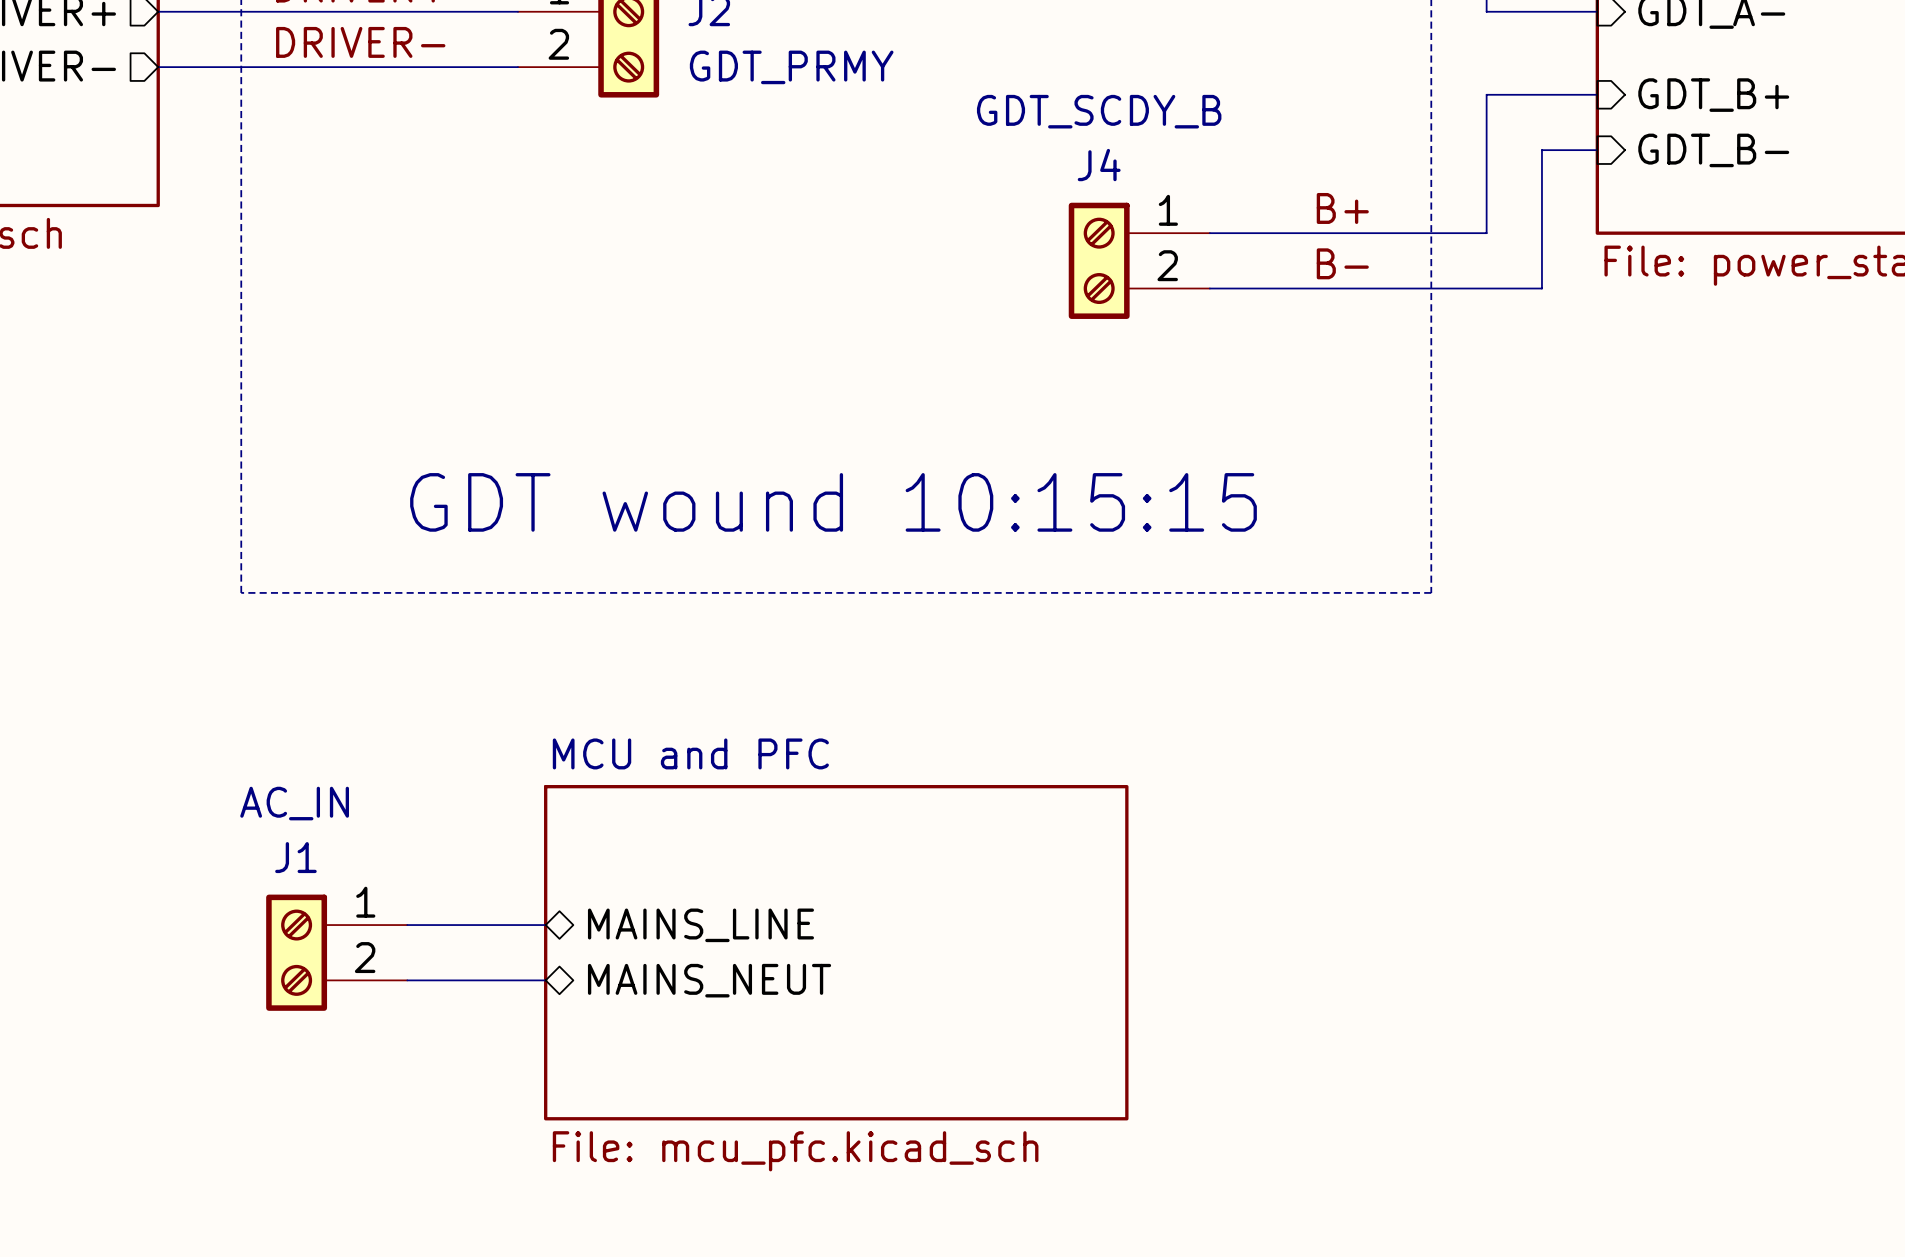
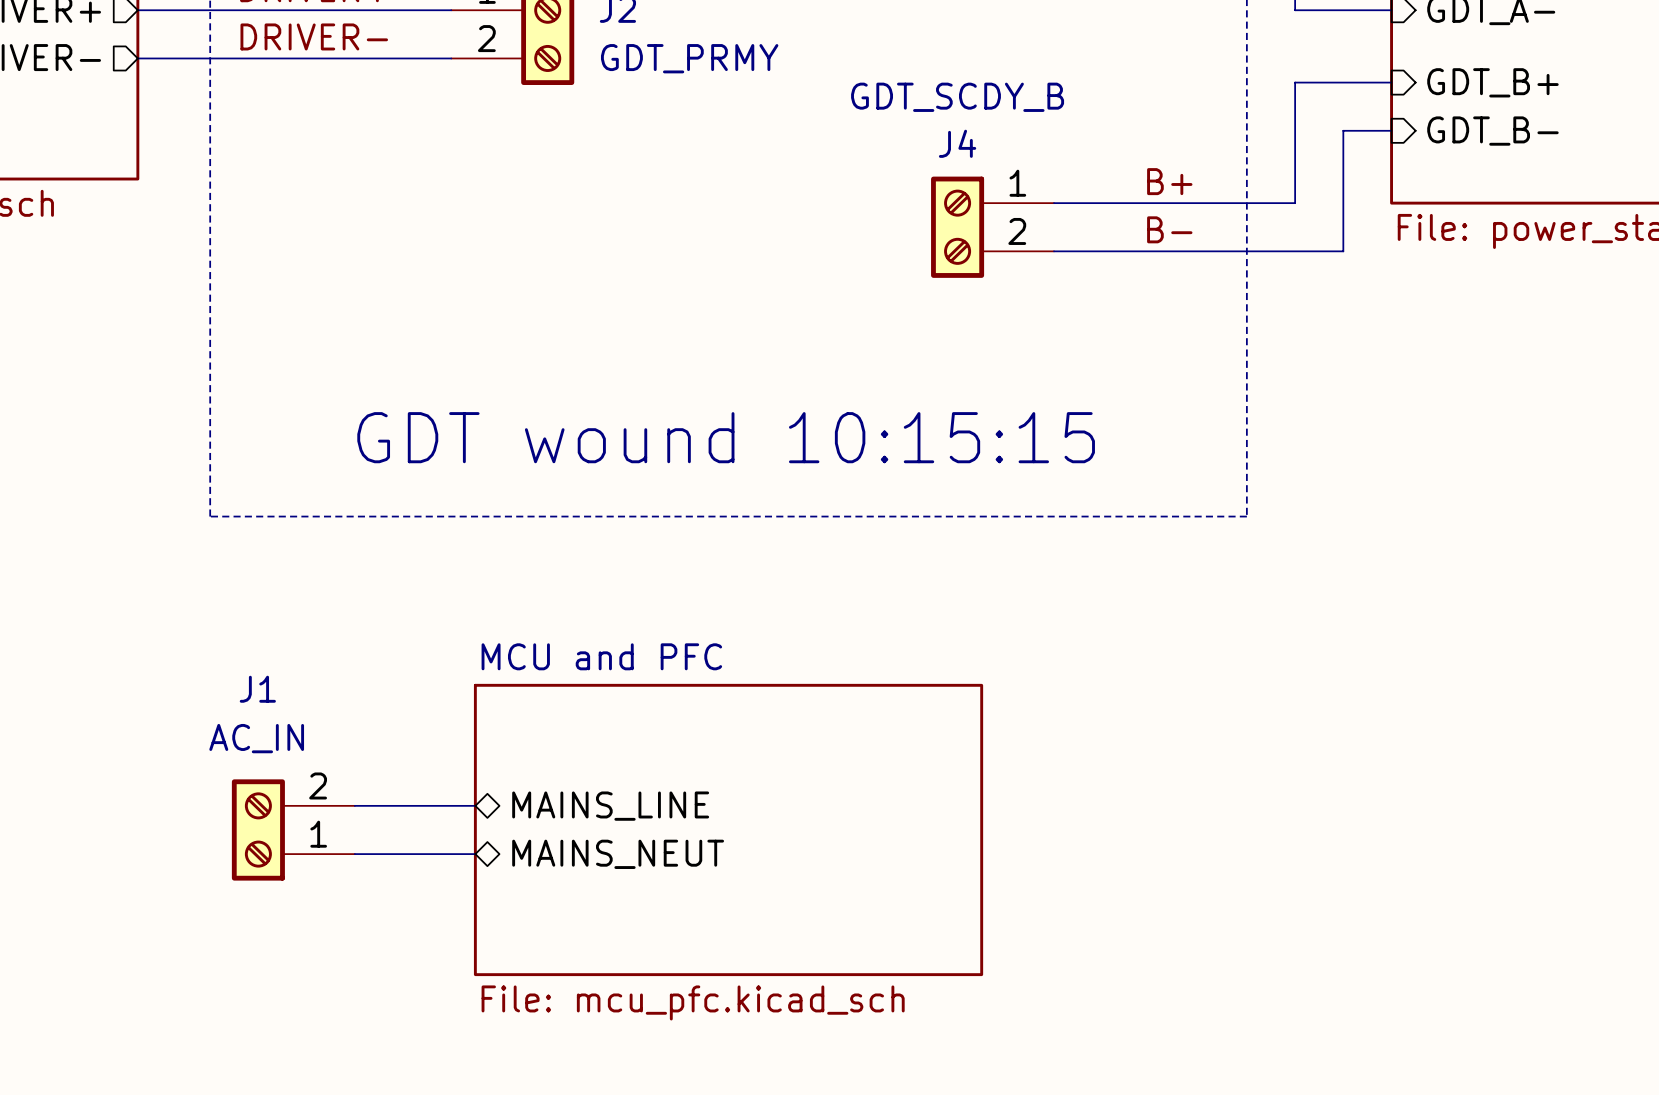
J1 value position: AC_IN (294, 803) -> AC_IN (256, 738)
J1 name position: J1 (295, 857) -> J1 (257, 689)
J1 flip: as is (296, 952) -> up-down (258, 829)

